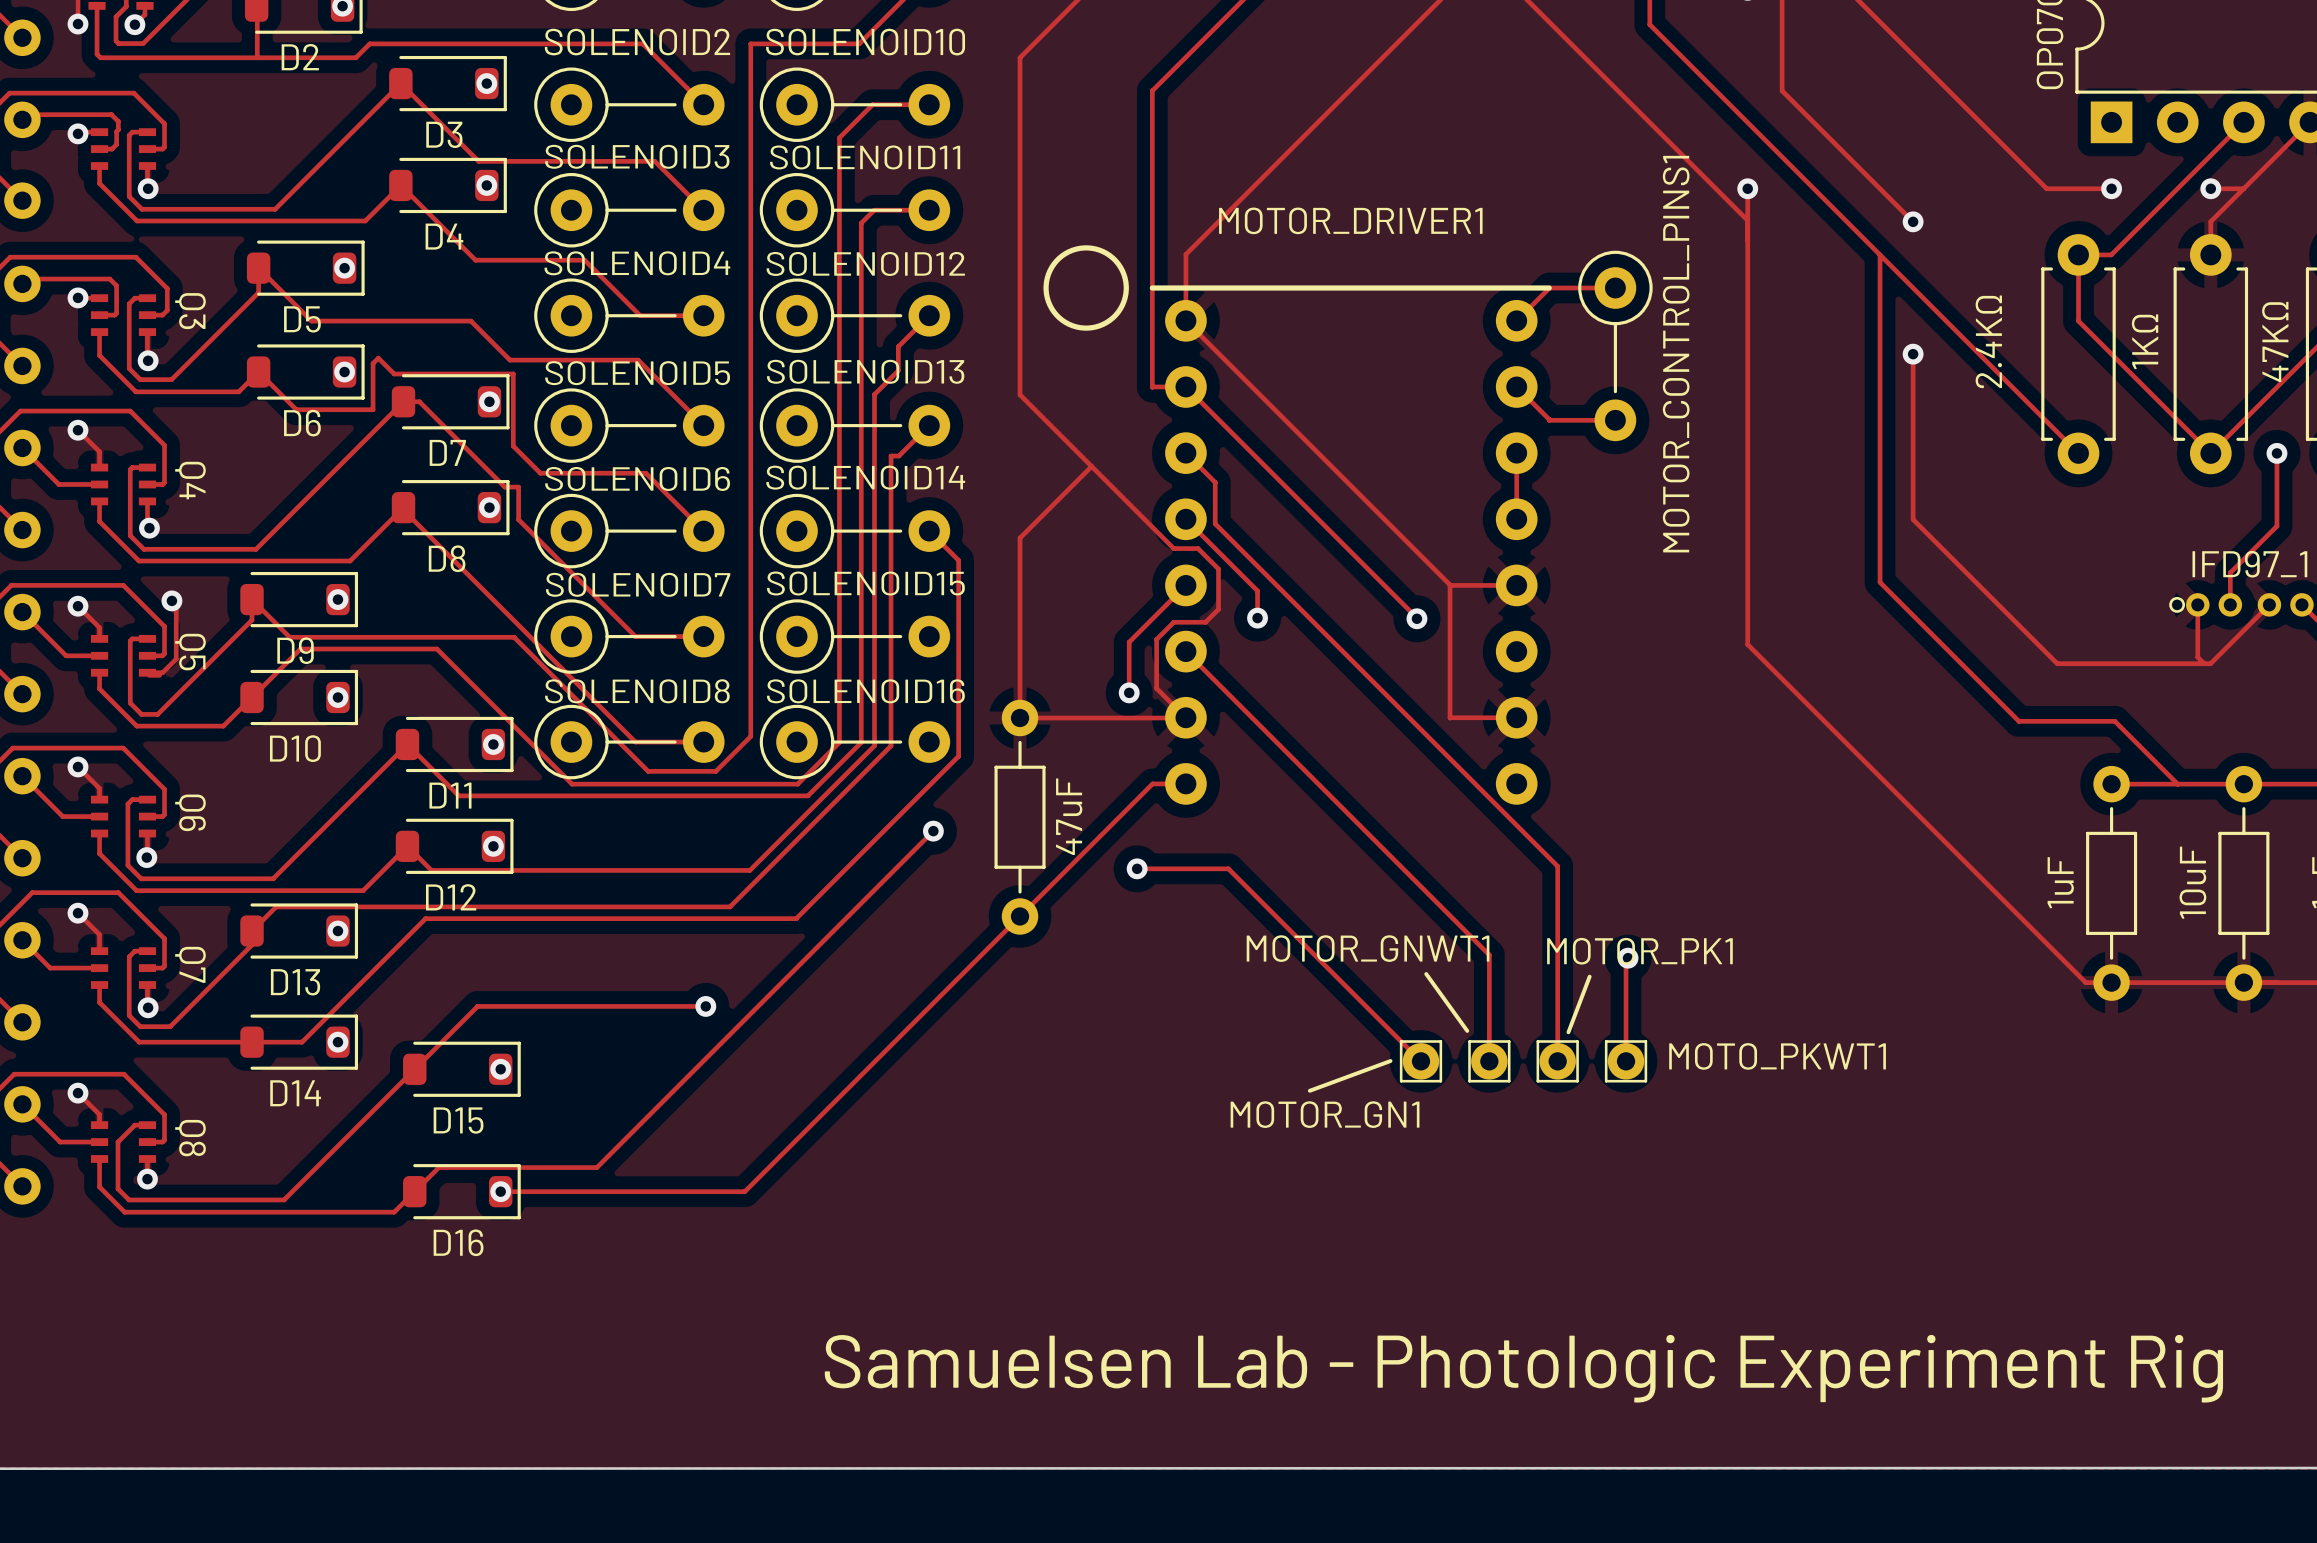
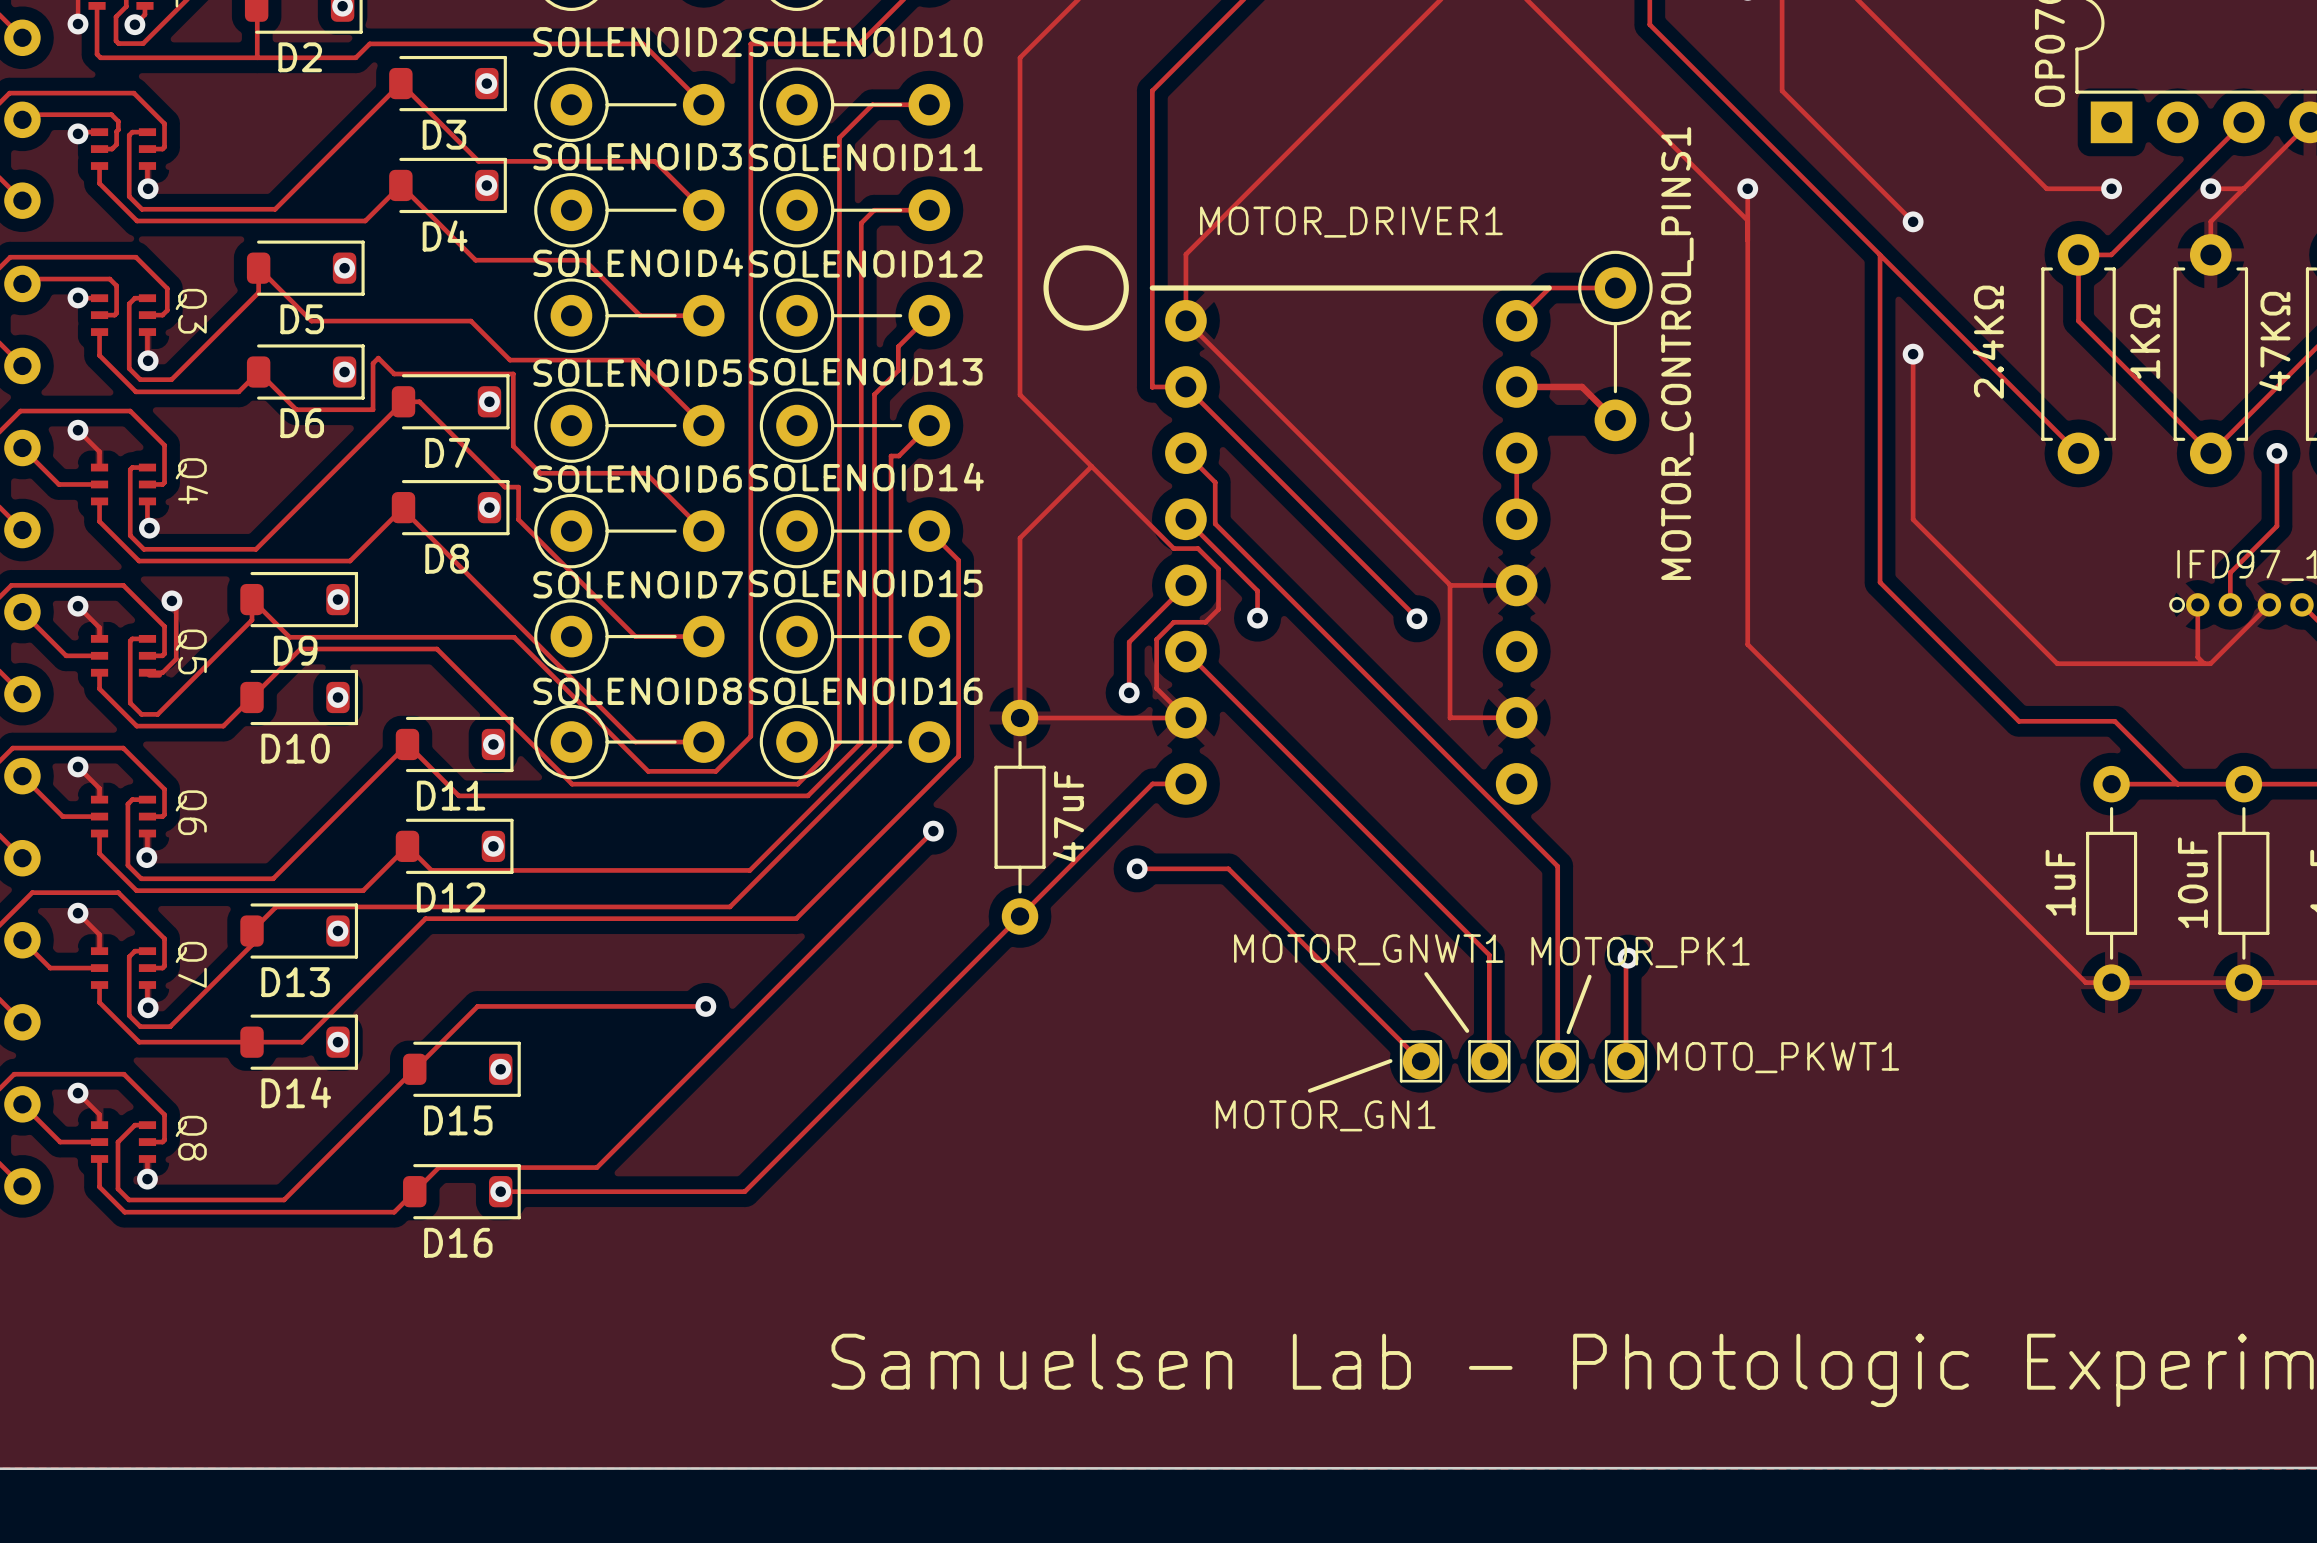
track: (1516, 386) (1549, 420) (1615, 420) -> (1516, 386) (1582, 386) (1615, 420)

